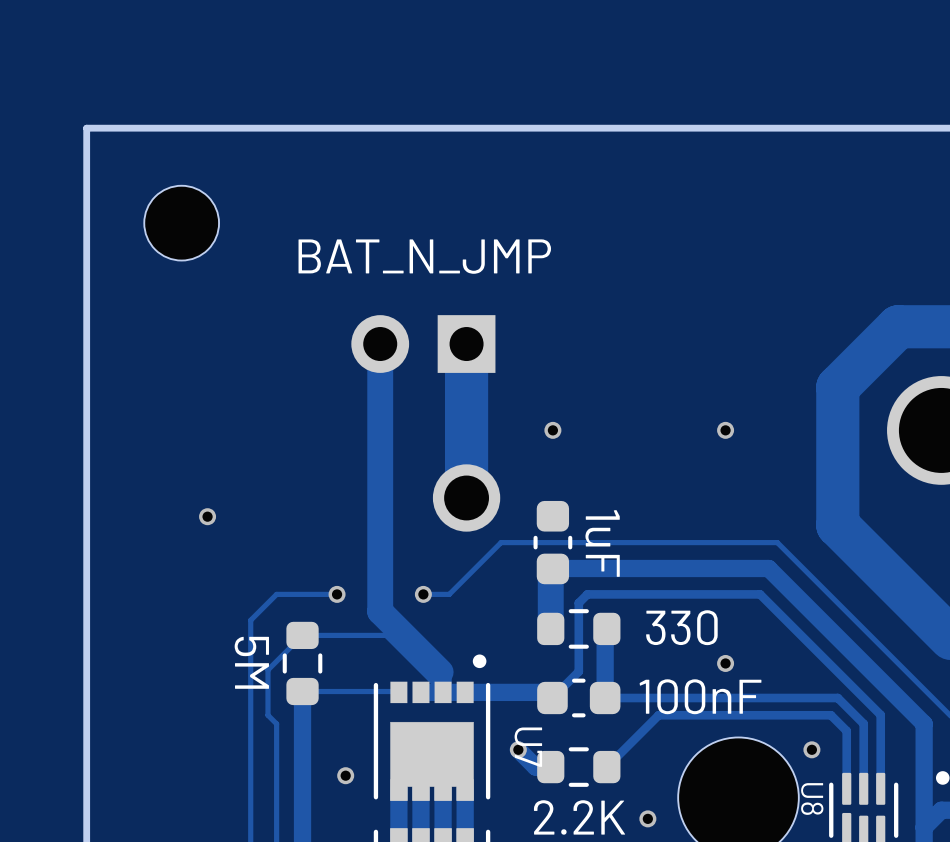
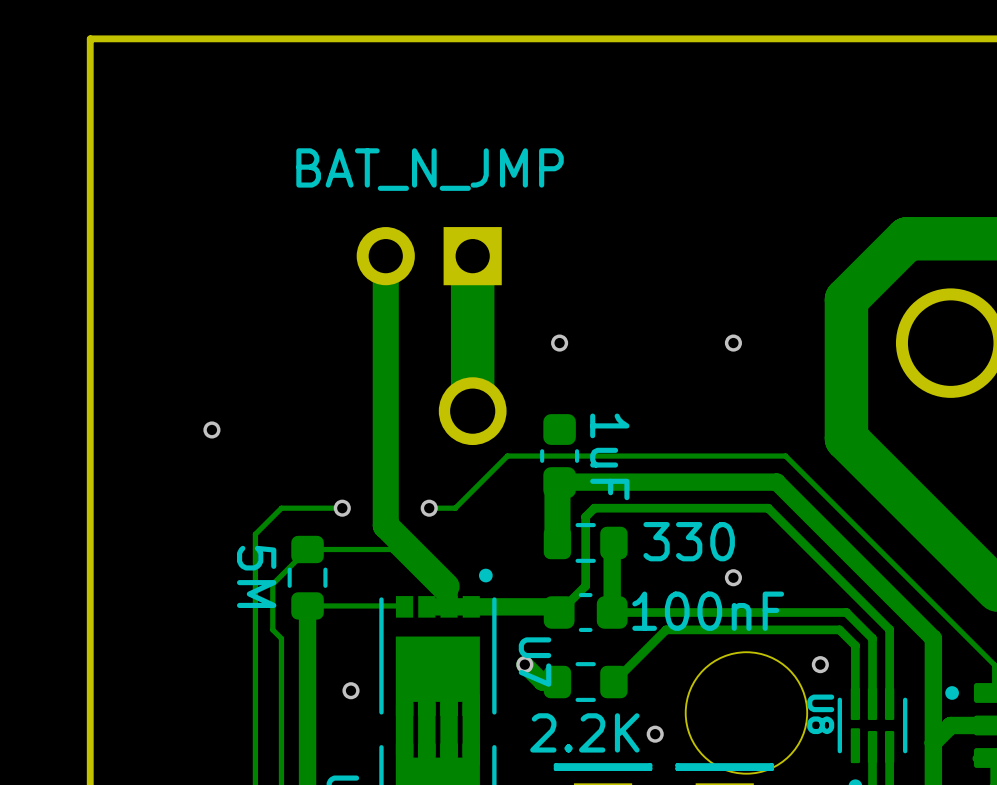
part: (181, 223) -> none

